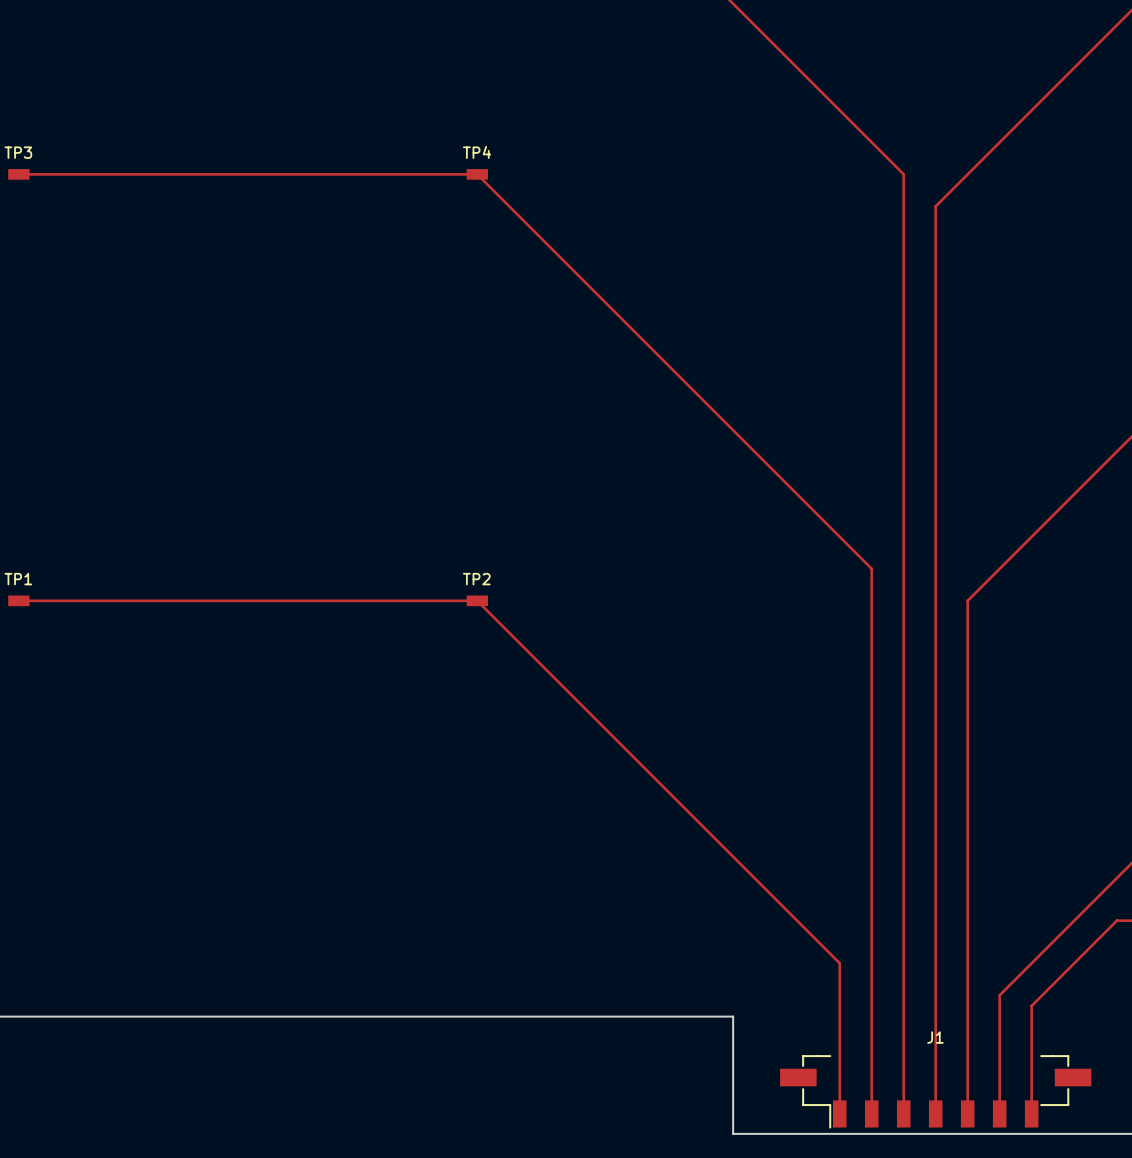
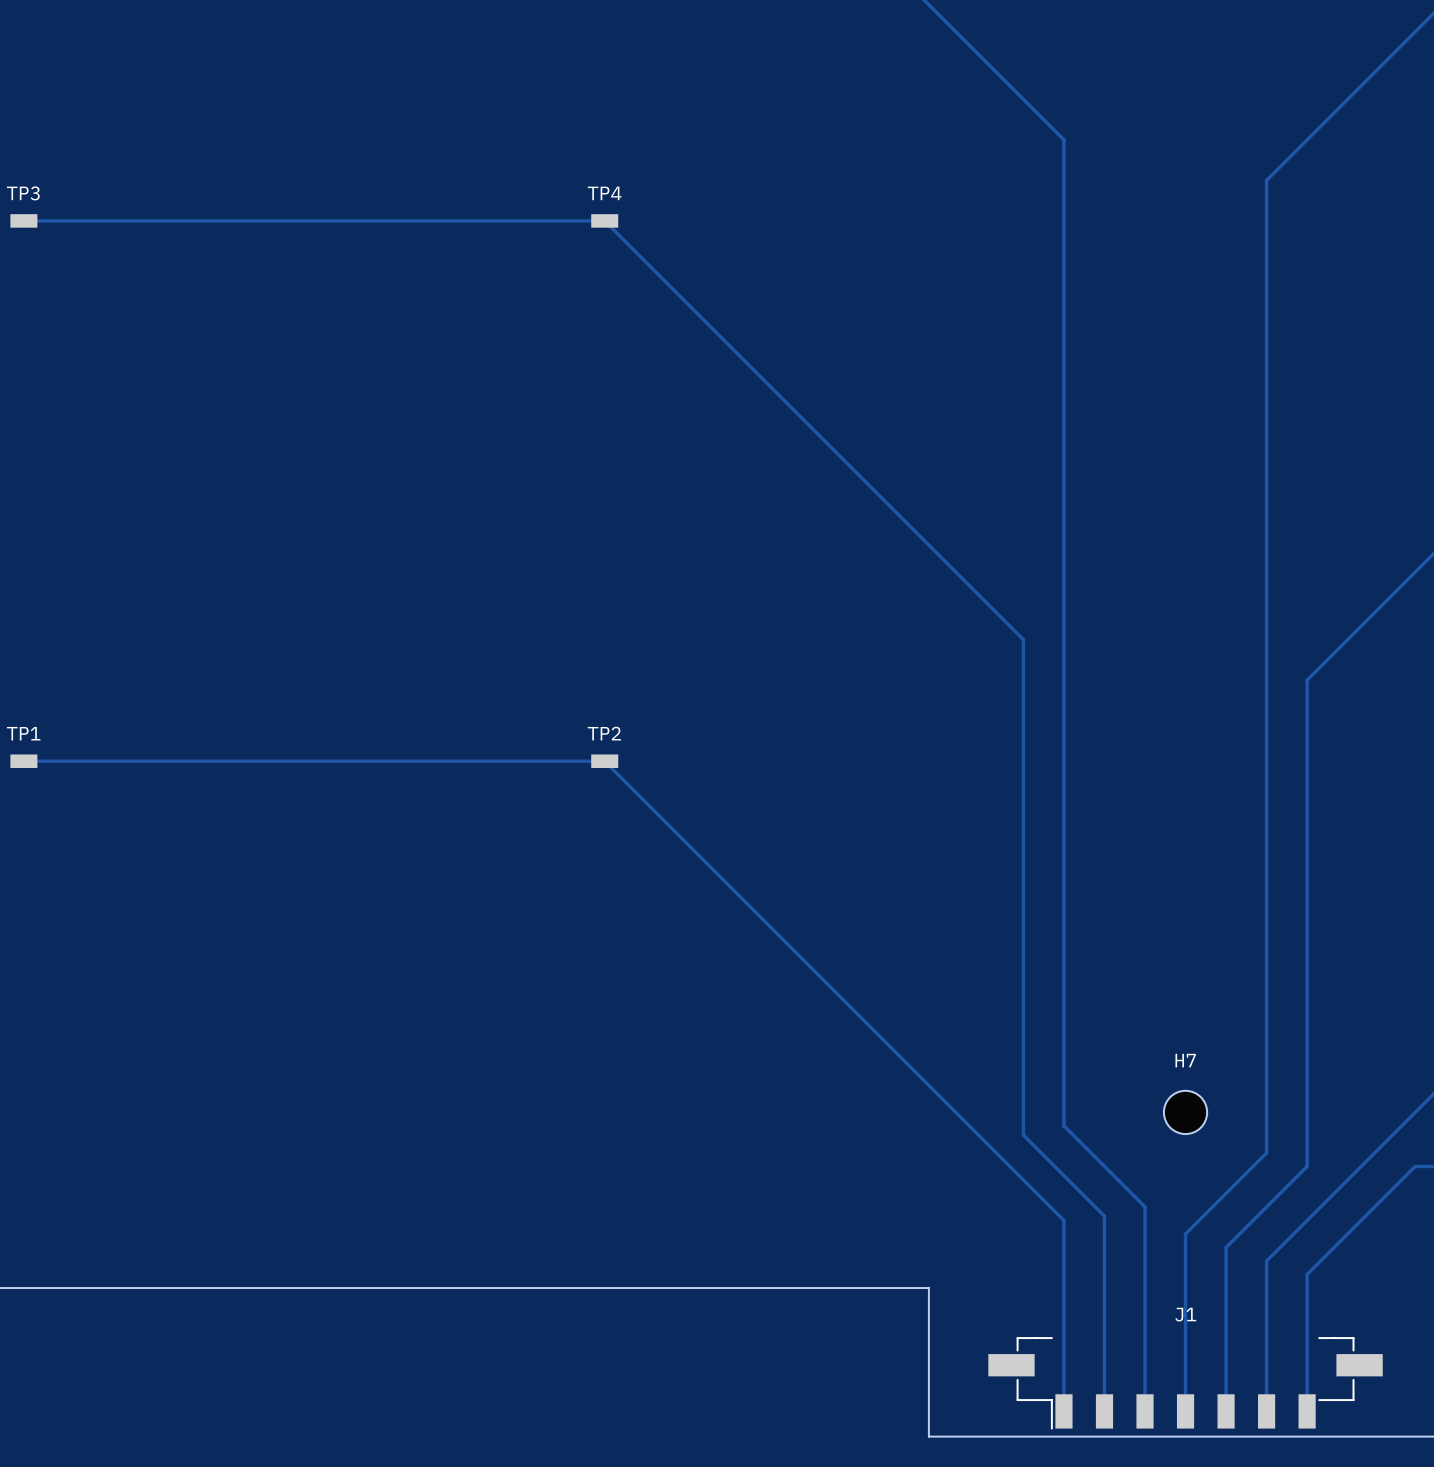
track: (839, 110) (903, 174) (903, 952) -> (1063, 139) (1063, 1125) (1145, 1206)
track: (999, 142) (935, 206) (935, 973) -> (1266, 180) (1266, 1152) (1185, 1233)
track: (807, 504) (871, 568) (871, 959) -> (1023, 639) (1023, 1135) (1104, 1216)
track: (1031, 536) (967, 600) (967, 984) -> (1307, 680) (1307, 1166) (1226, 1247)
H7: none -> (1185, 1112)

